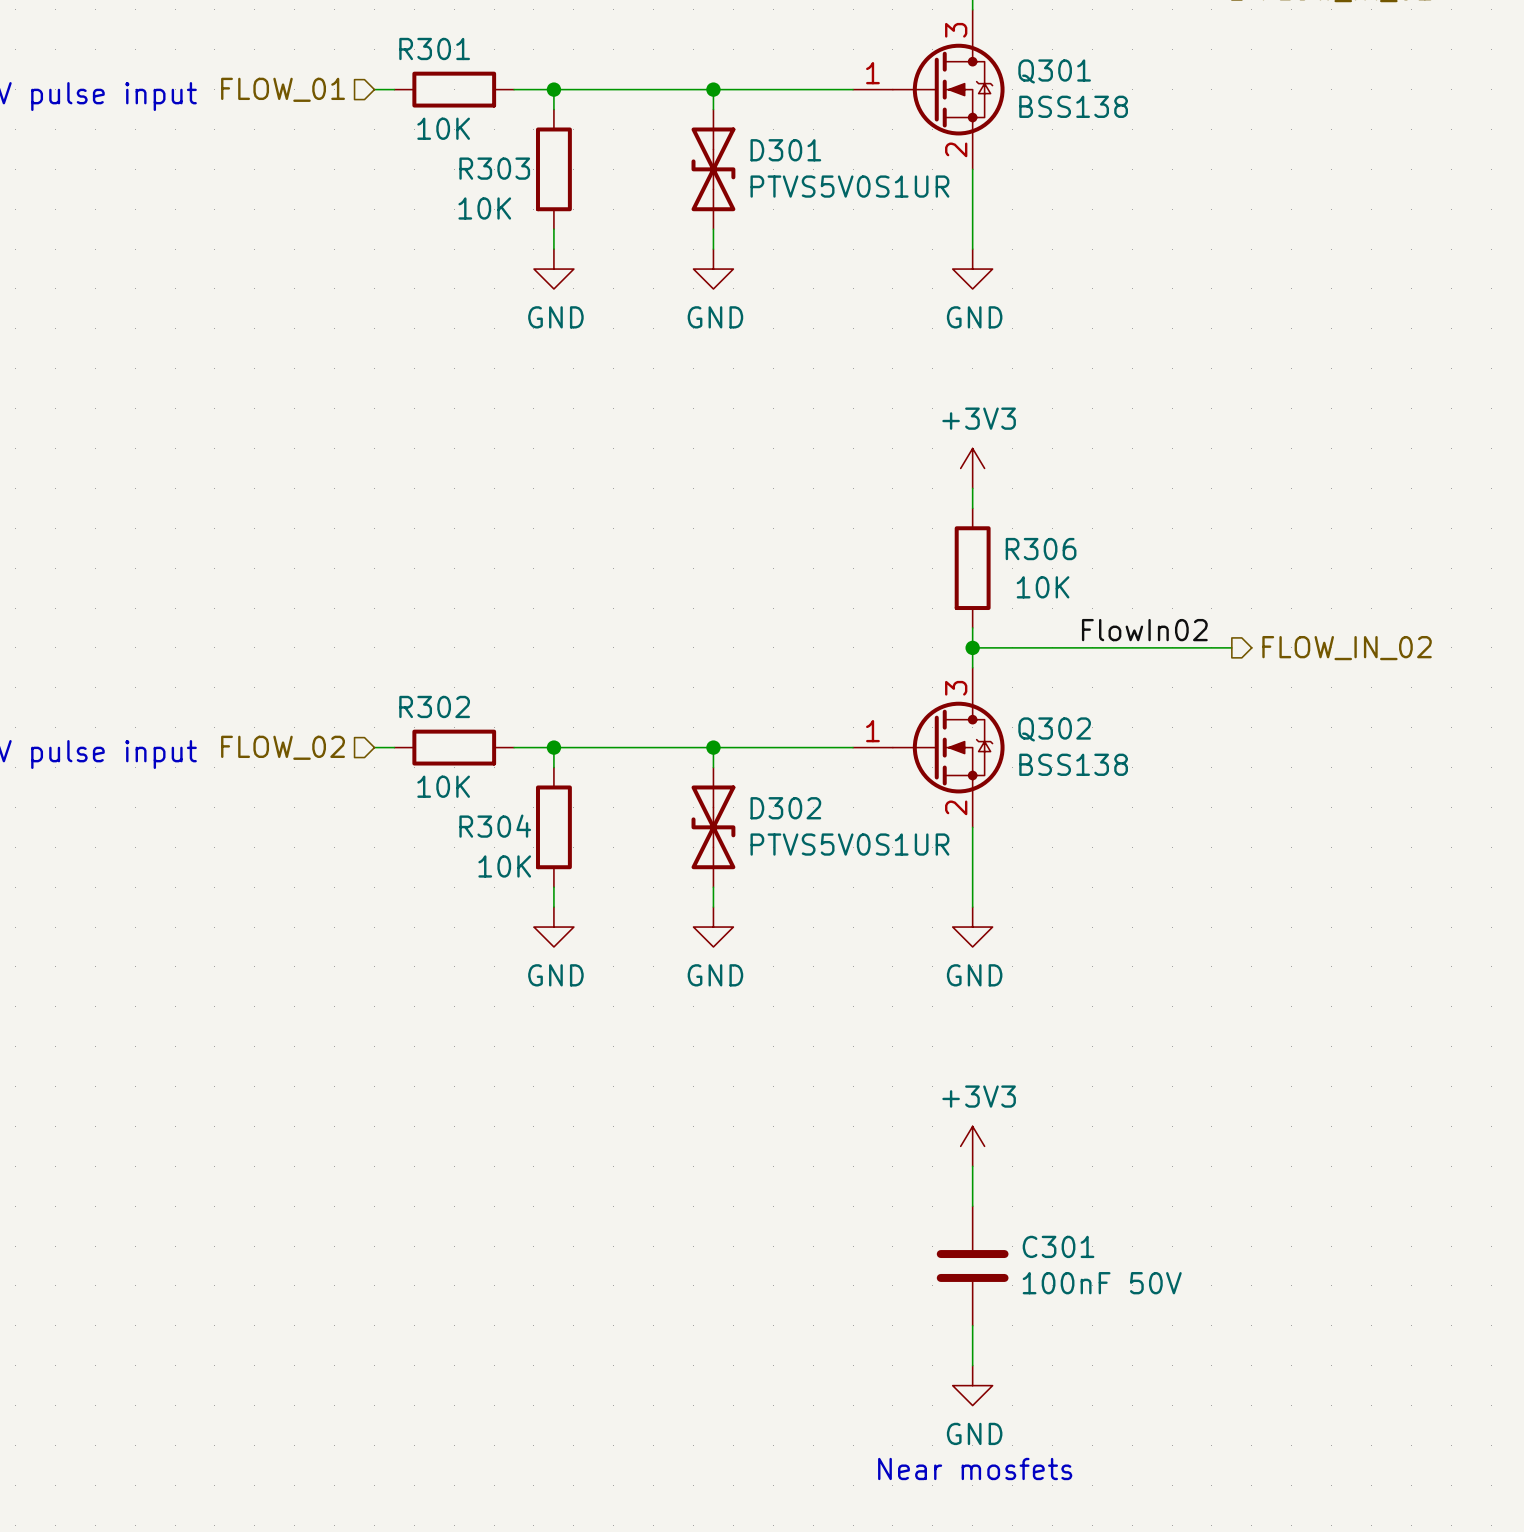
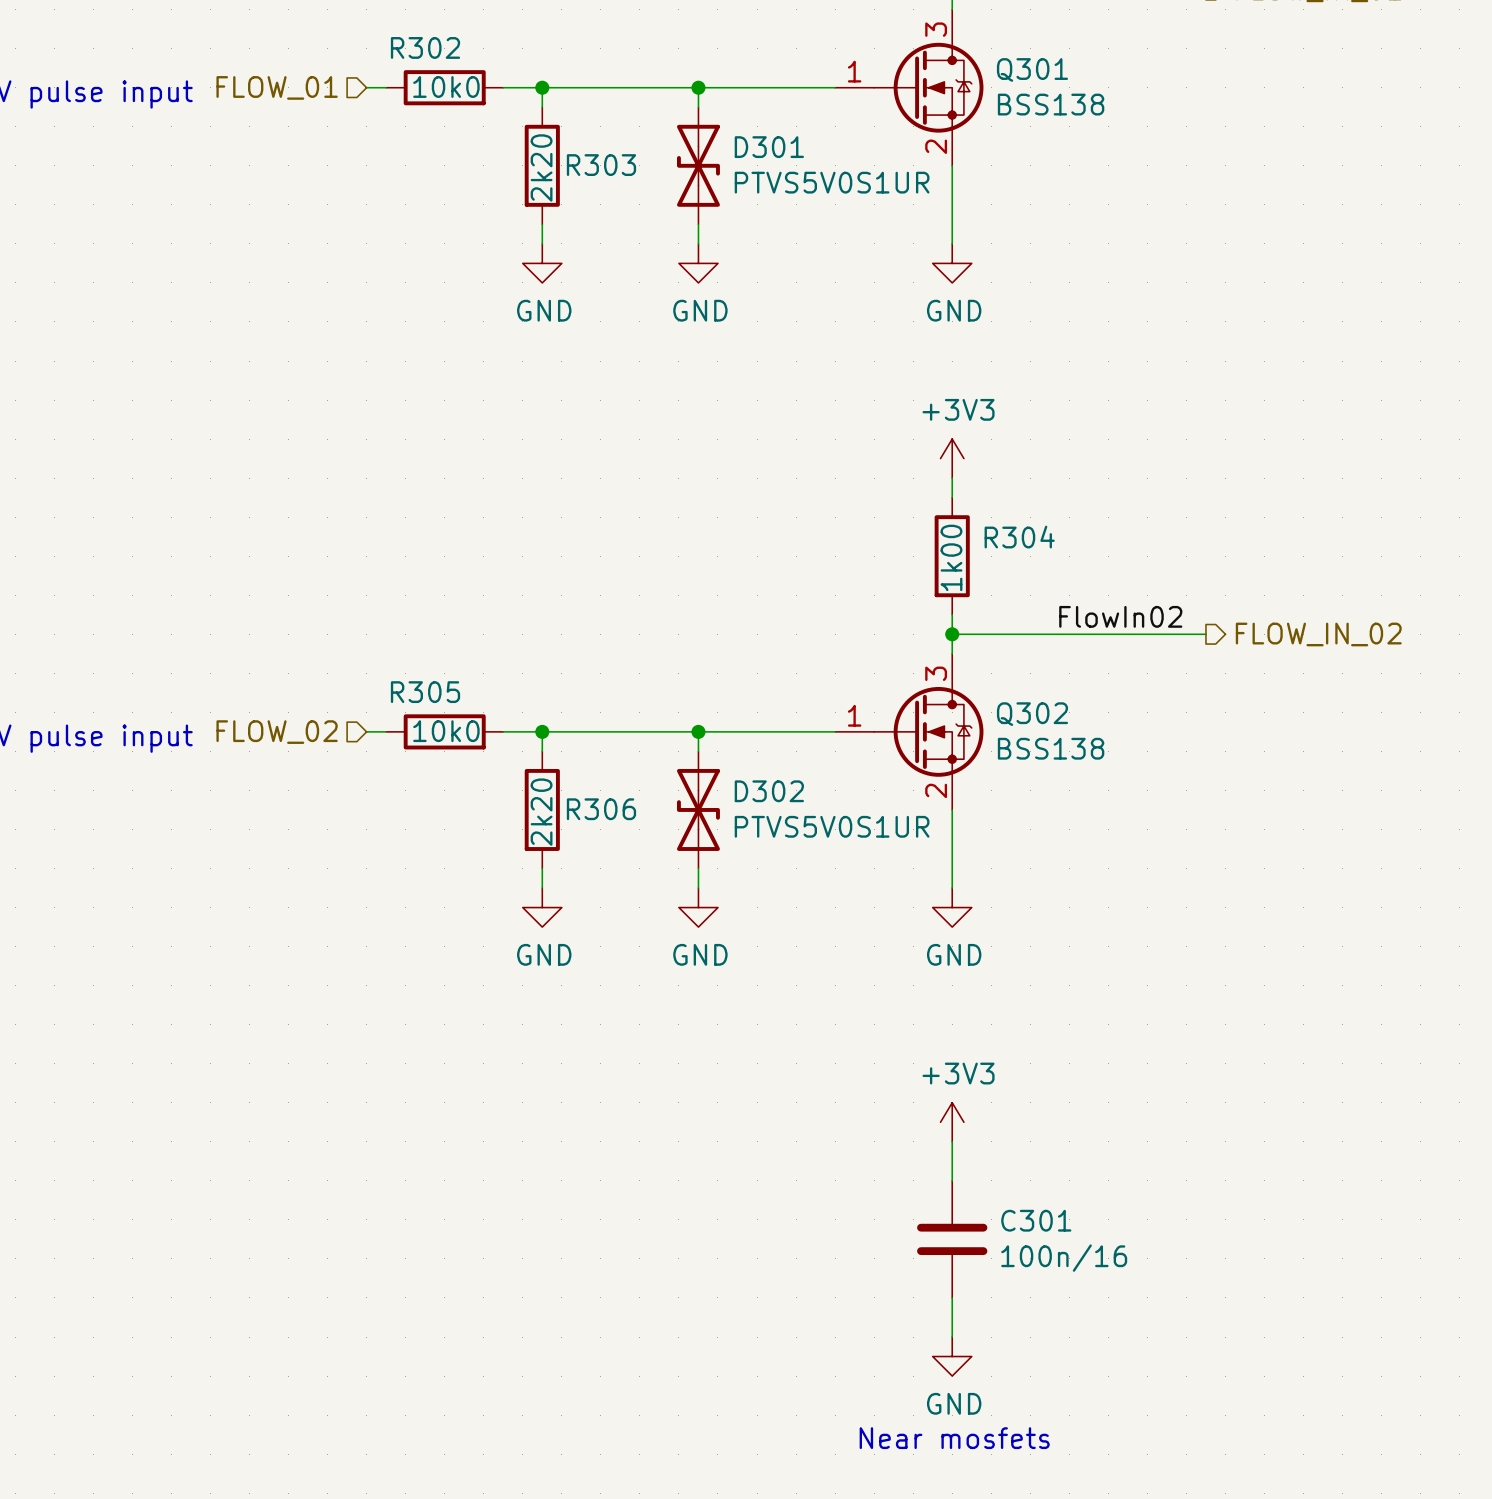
R301 name: R301 (434, 48) -> R302 (425, 47)
R301 value: 10K (443, 128) -> 10k0 (446, 86)
R303 name position: R303 (494, 168) -> R303 (601, 165)
R303 value: 10K (484, 208) -> 2k20 (541, 167)
R306 name: R306 (1041, 549) -> R304 (1019, 537)
R306 value: 10K (1043, 587) -> 1k00 (951, 557)
R302 name: R302 (434, 706) -> R305 (425, 692)
R302 value: 10K (443, 786) -> 10k0 (446, 731)
R304 name: R304 (495, 826) -> R306 (601, 809)
R304 value: 10K (504, 866) -> 2k20 (541, 812)
C301 value: 100nF 50V (1102, 1283) -> 100n/16 (1064, 1258)

